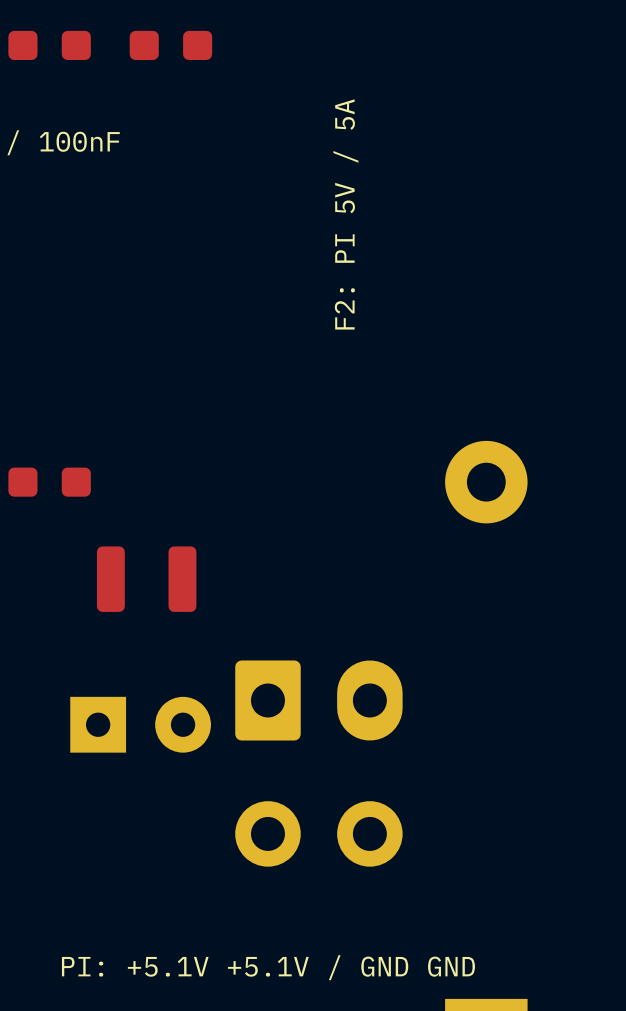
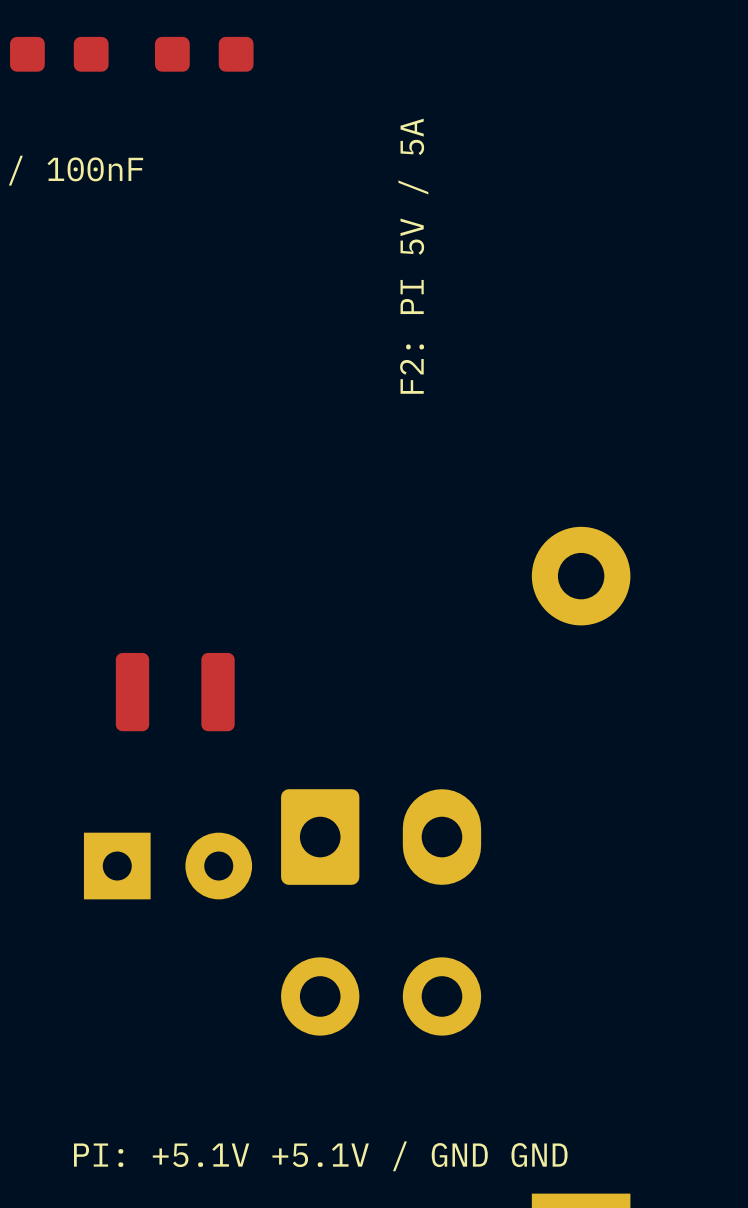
part: (49, 482) -> none

